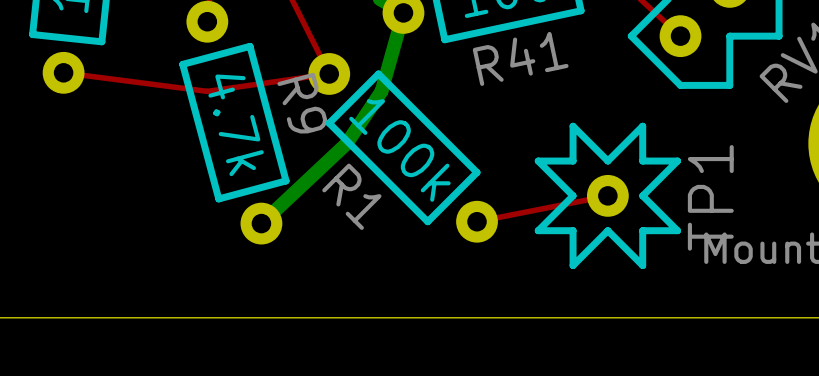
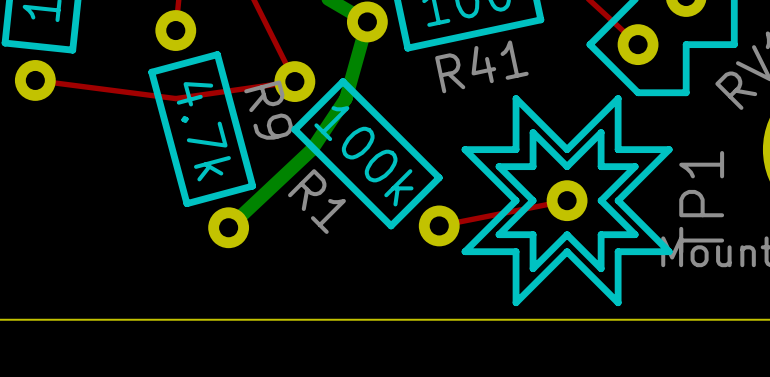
TP1 footprint: [534, 122, 682, 270] -> [461, 95, 673, 307]

